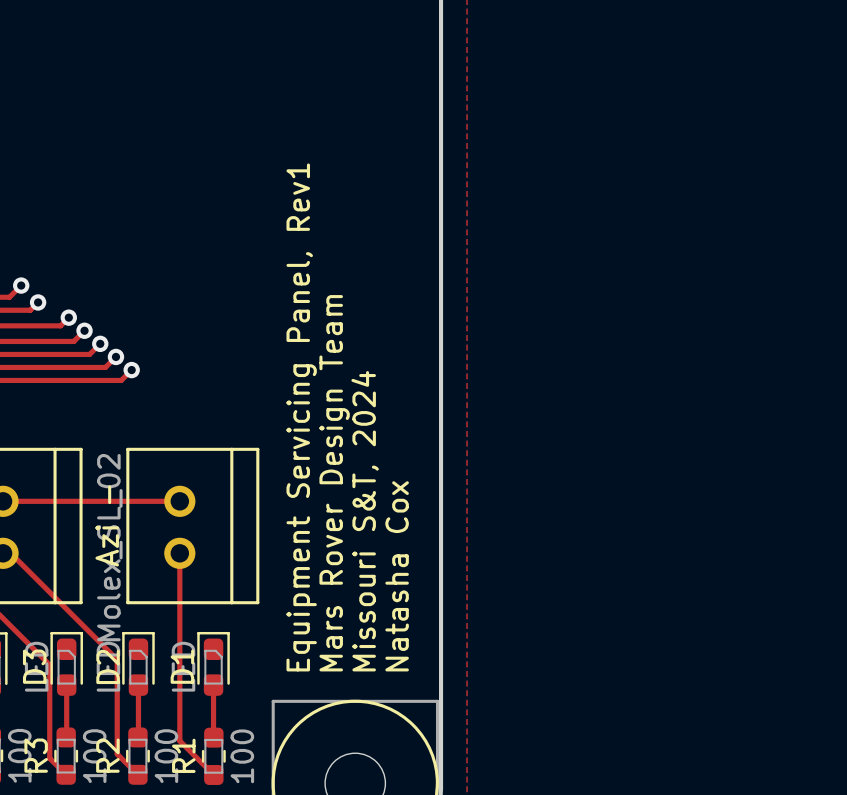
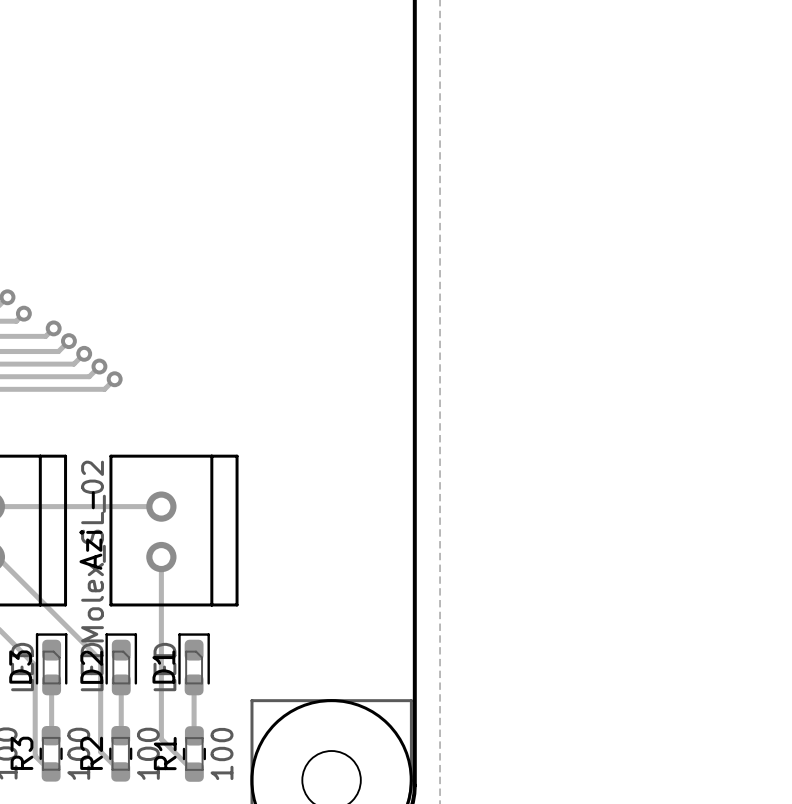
text: Equipment Servicing Panel, Rev1 (301, 417) -> none
text: Mars Rover Design Team (334, 483) -> none
text: Missouri S&T, 2024 (365, 521) -> none
text: Natasha Cox (397, 576) -> none

